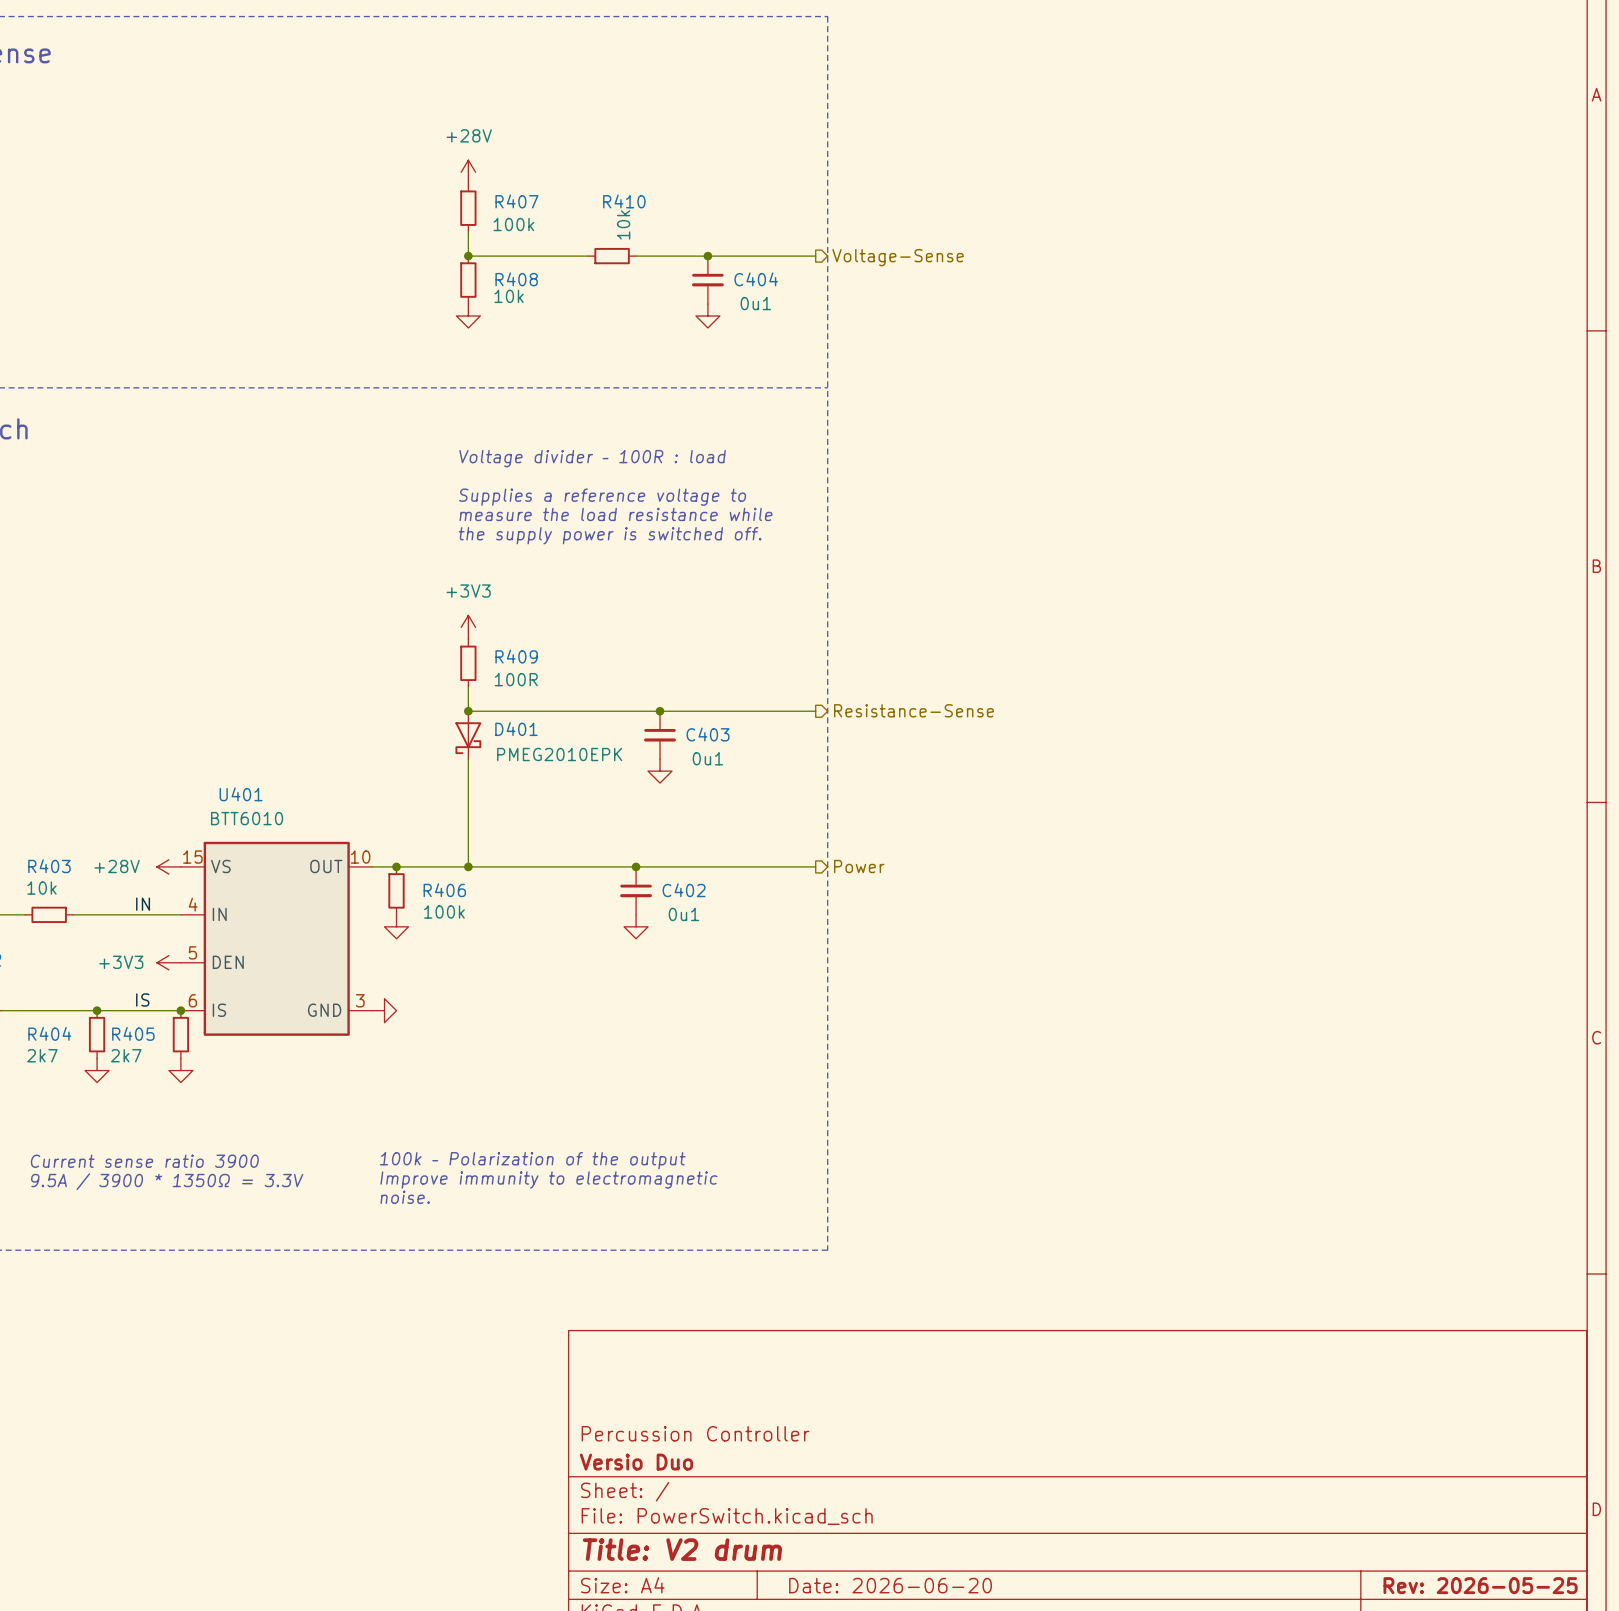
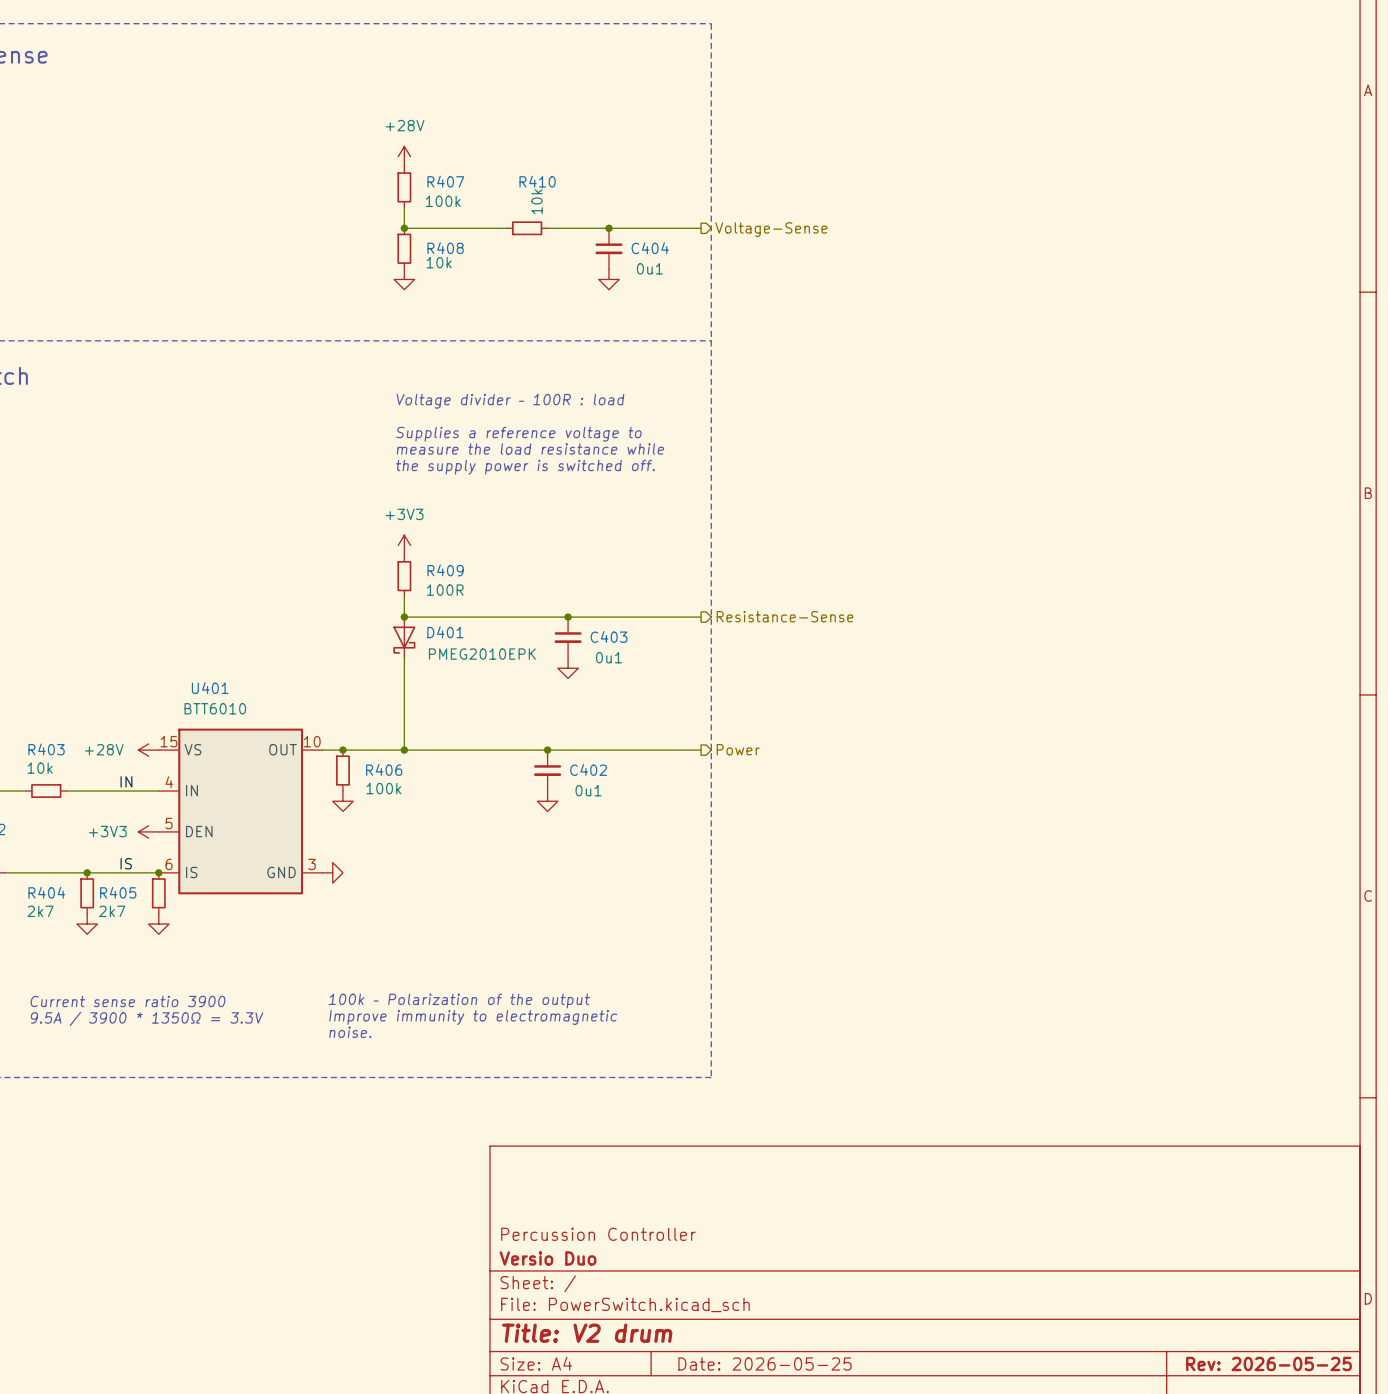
title block: Date: 2026-06-20 (890, 1585) -> Date: 2026-05-25 (764, 1363)

